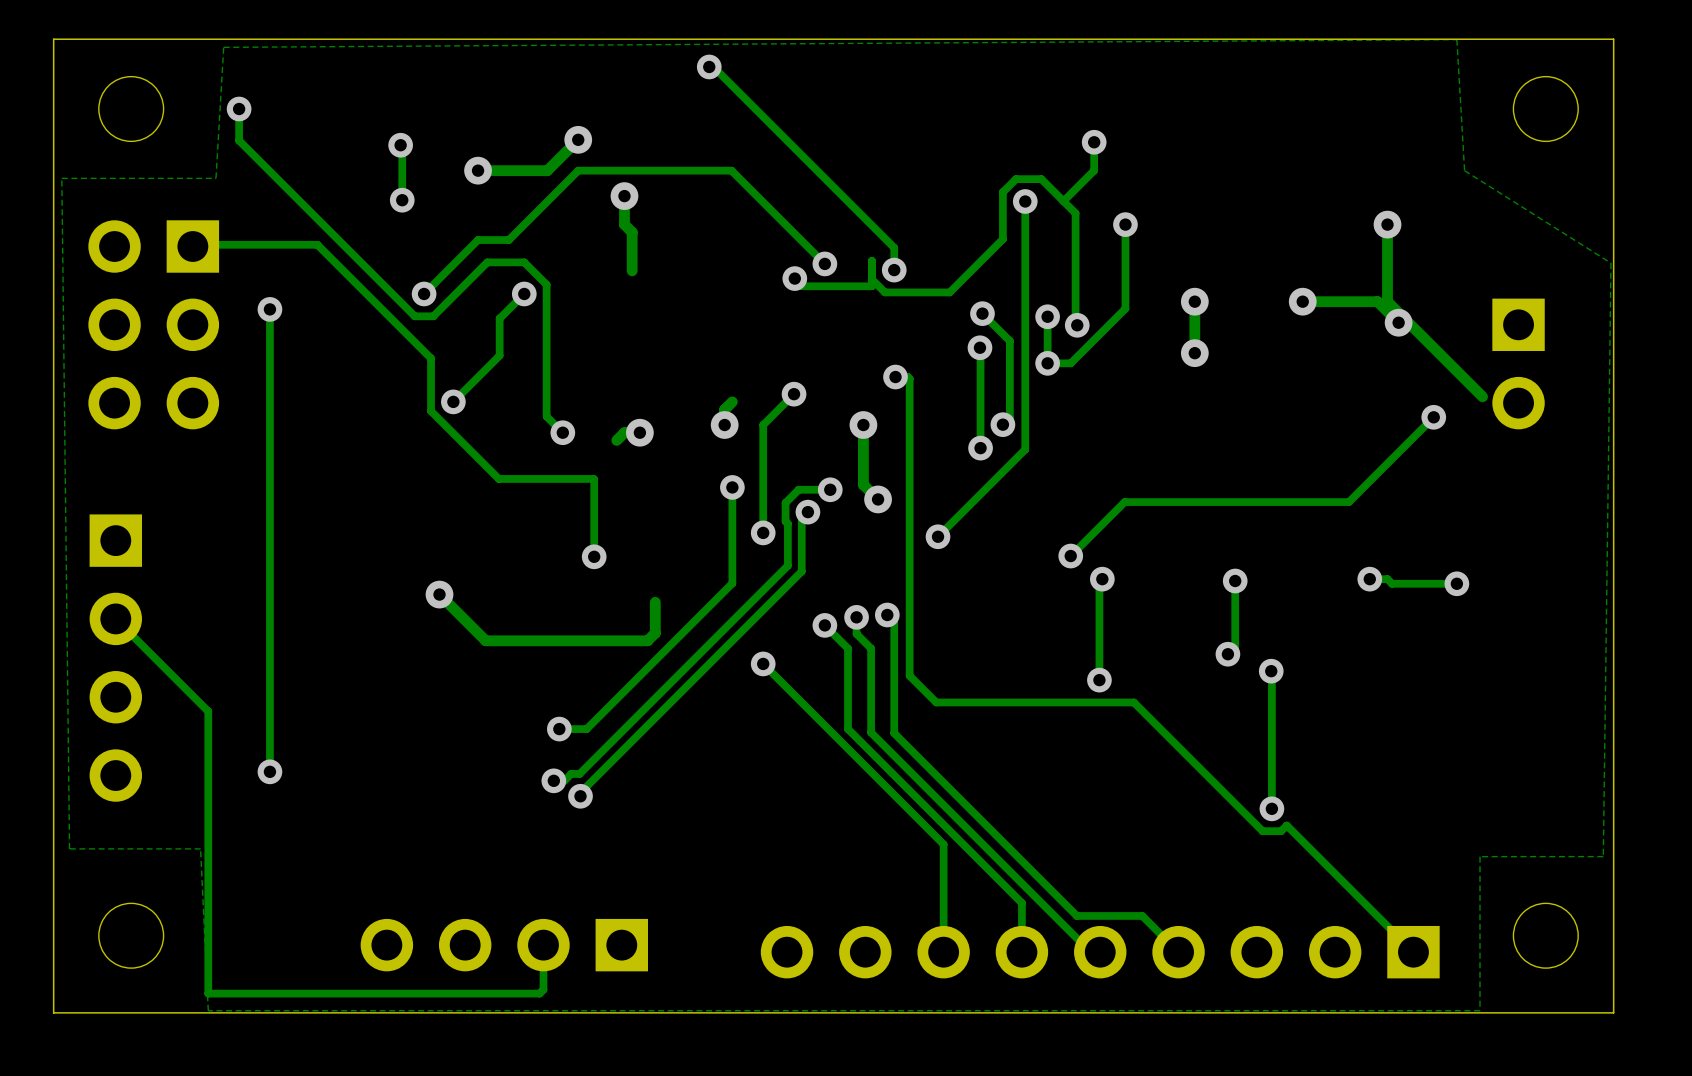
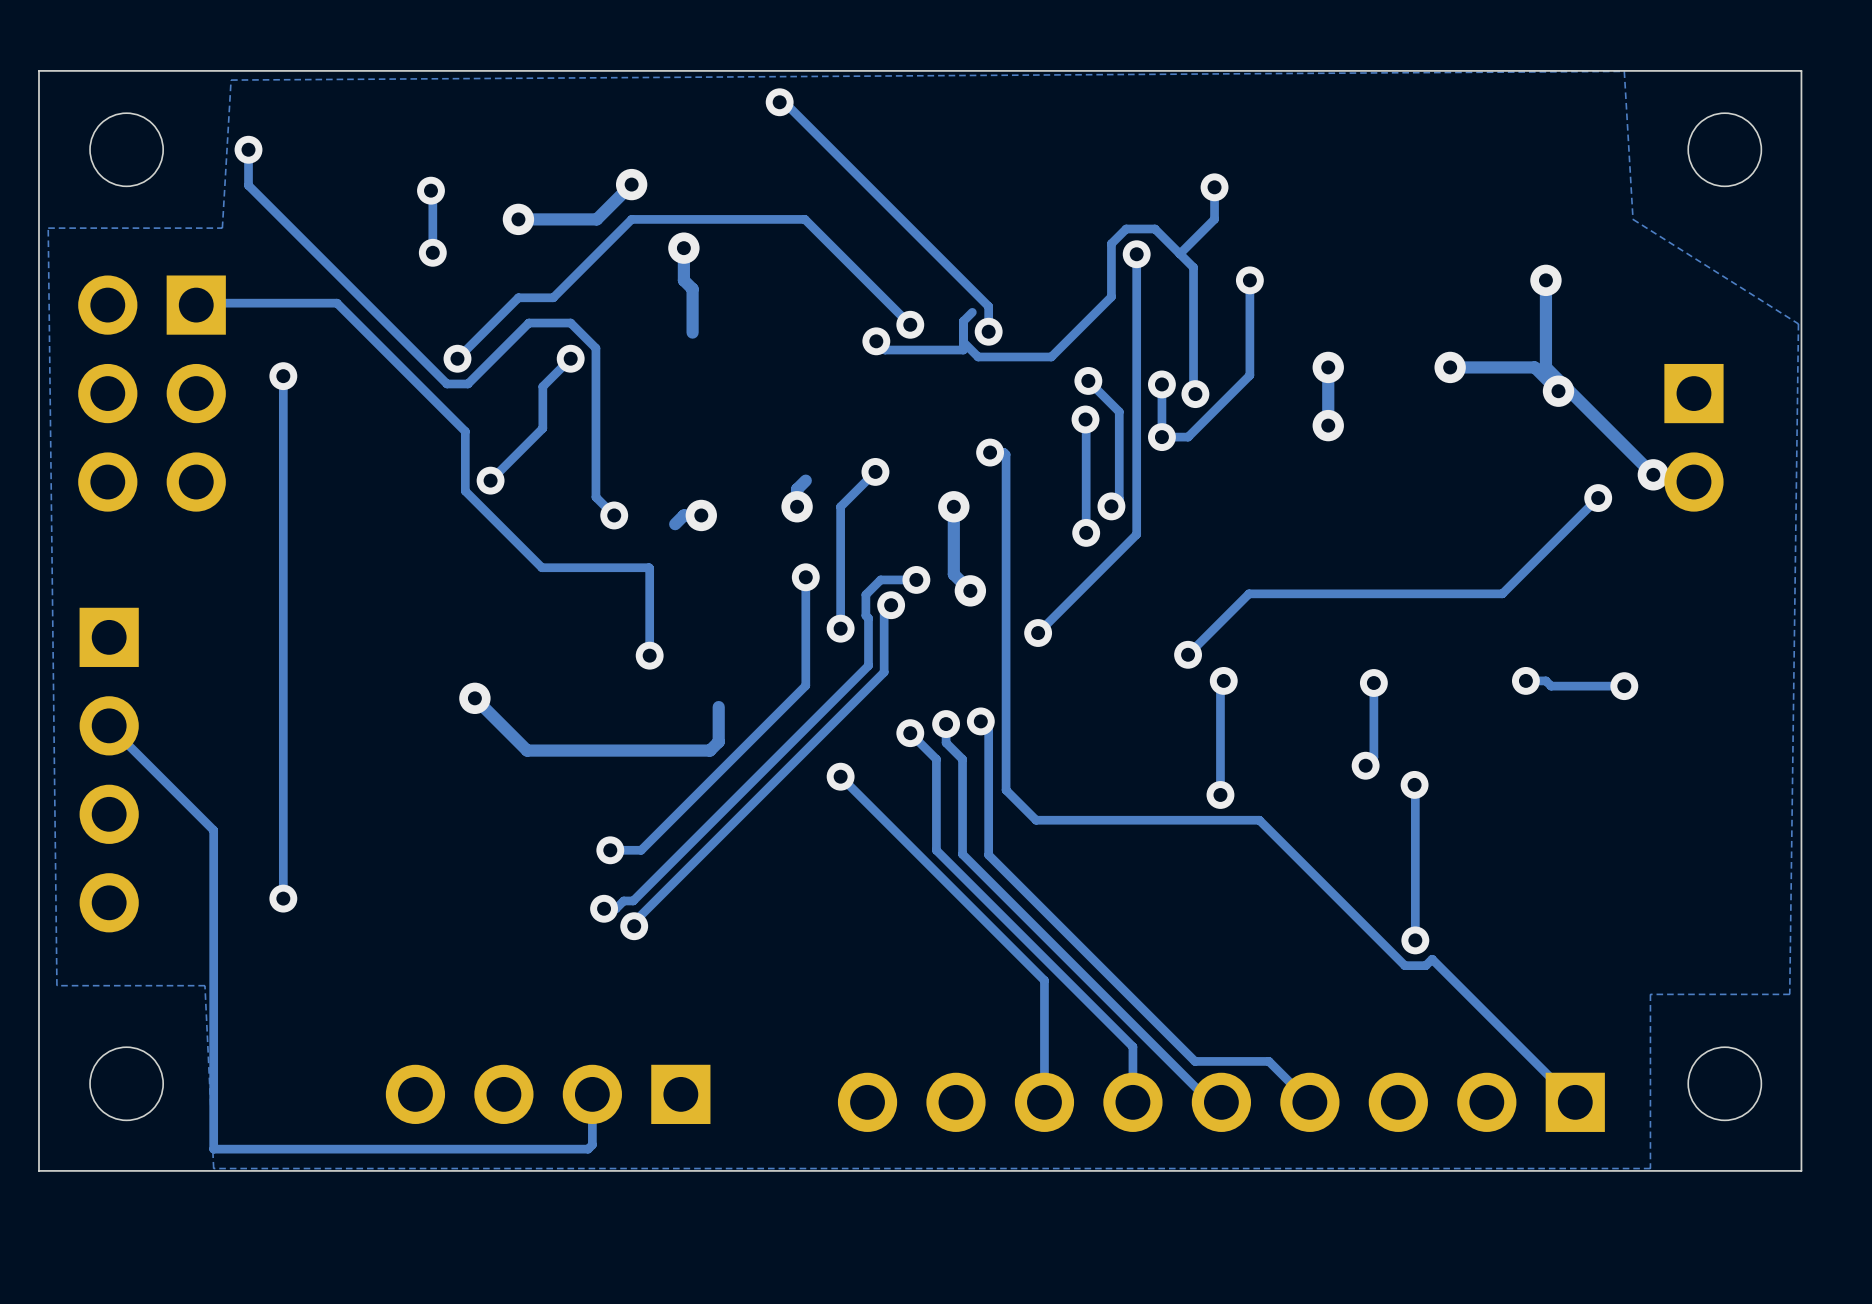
track: none -> (972, 312) (963, 321)
via: none -> (1653, 474)

